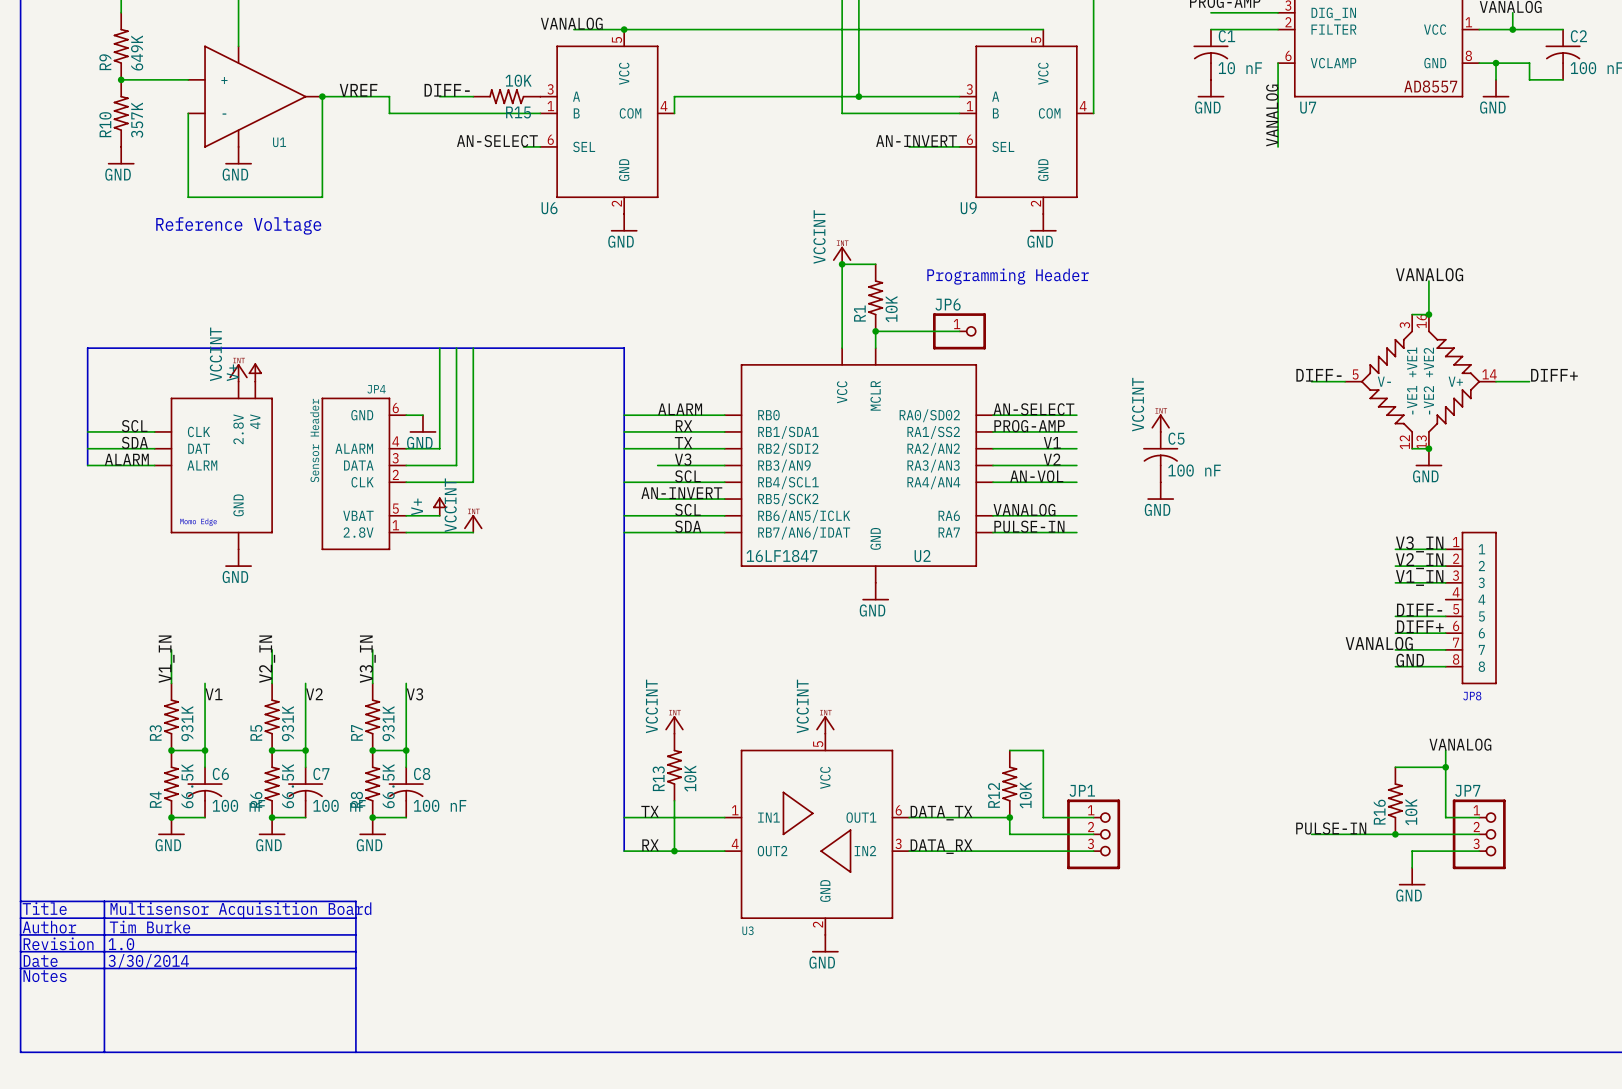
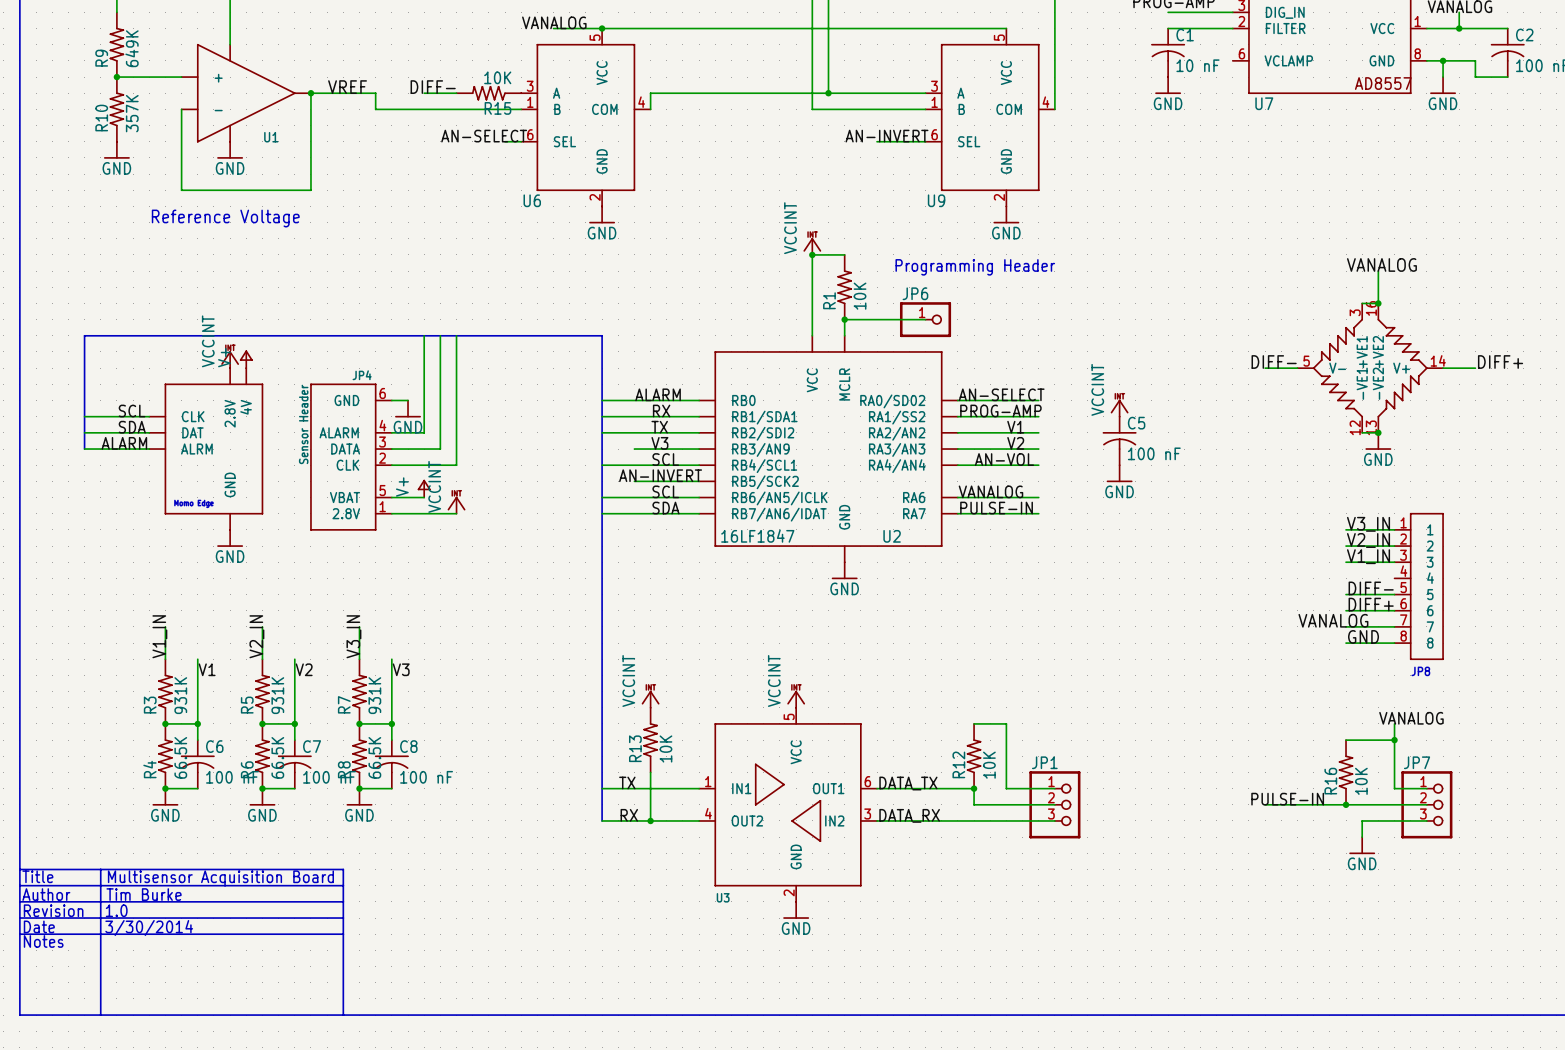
wire: (1278, 63) (1278, 146) -> none
label: VANALOG (1272, 115) -> none

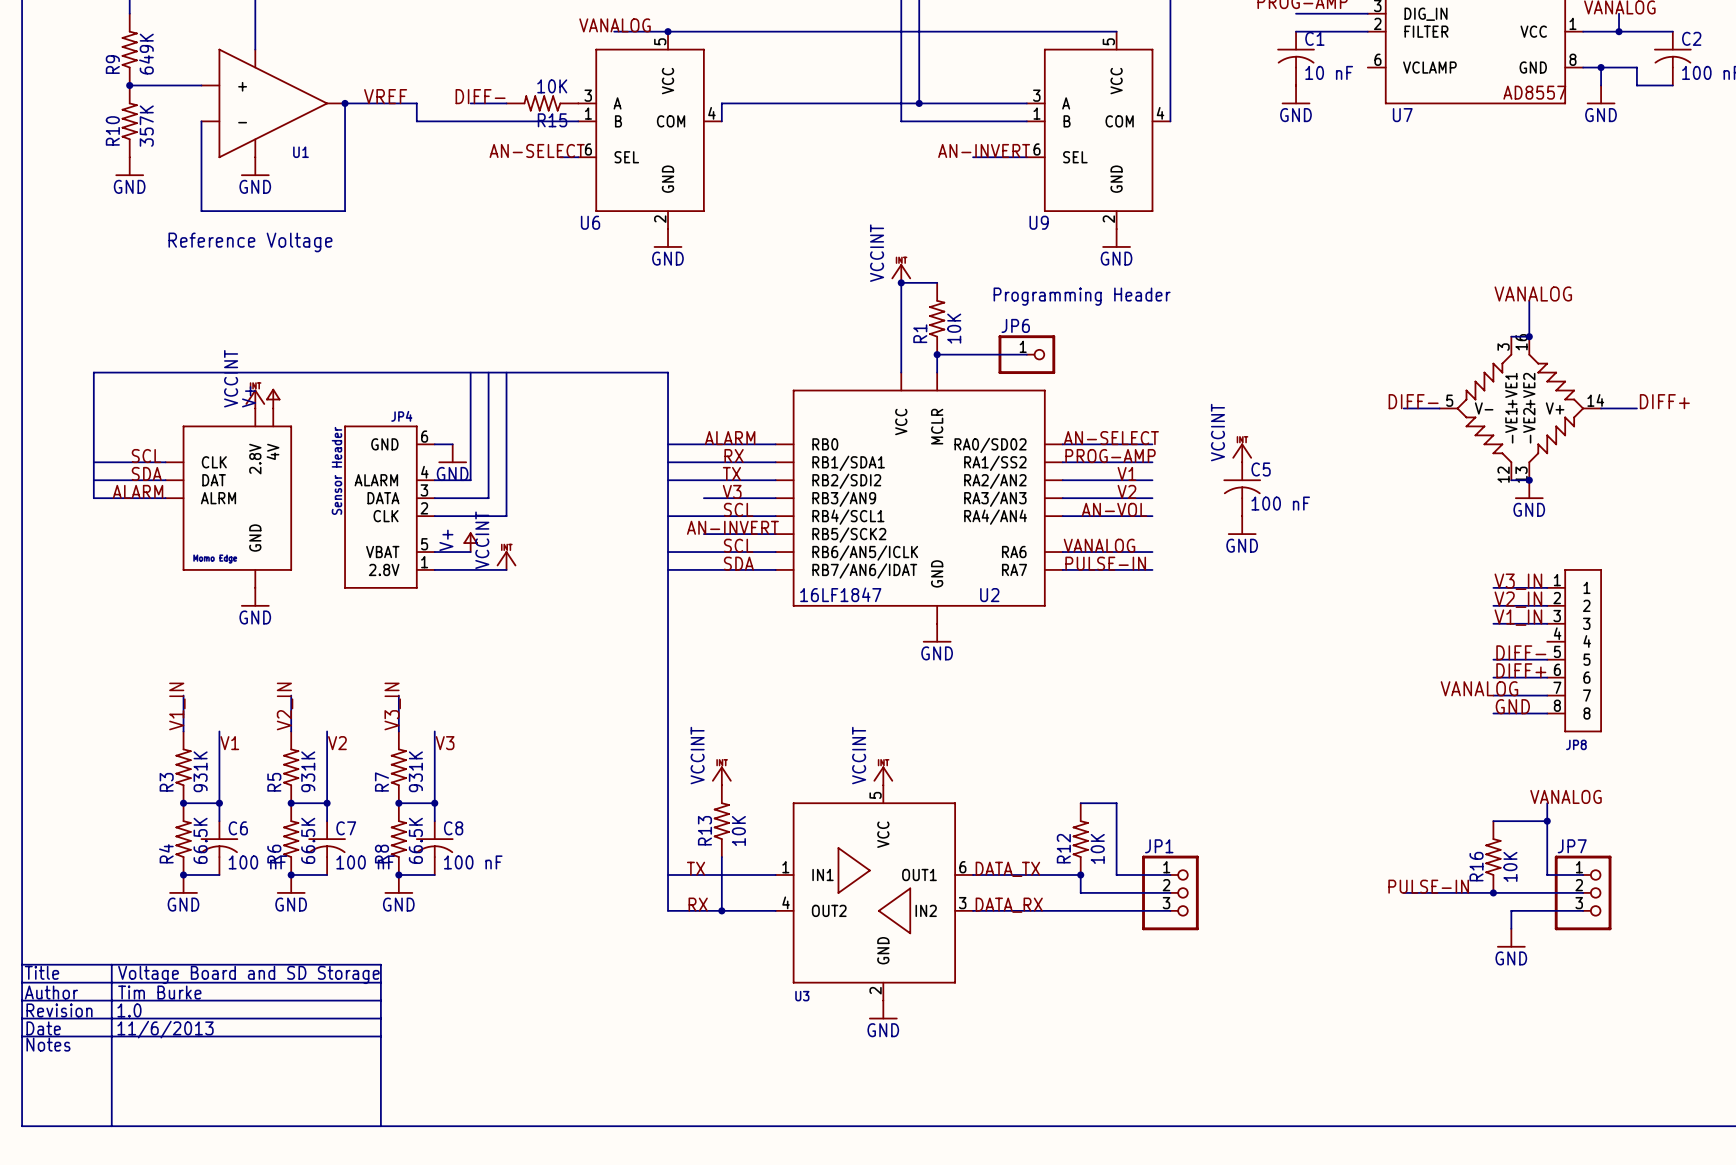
text: Multisensor Acquisition Board (220, 878) -> Voltage Board and SD Storage (248, 974)
text: 3/30/2014 (149, 927) -> 11/6/2013 (165, 1029)

